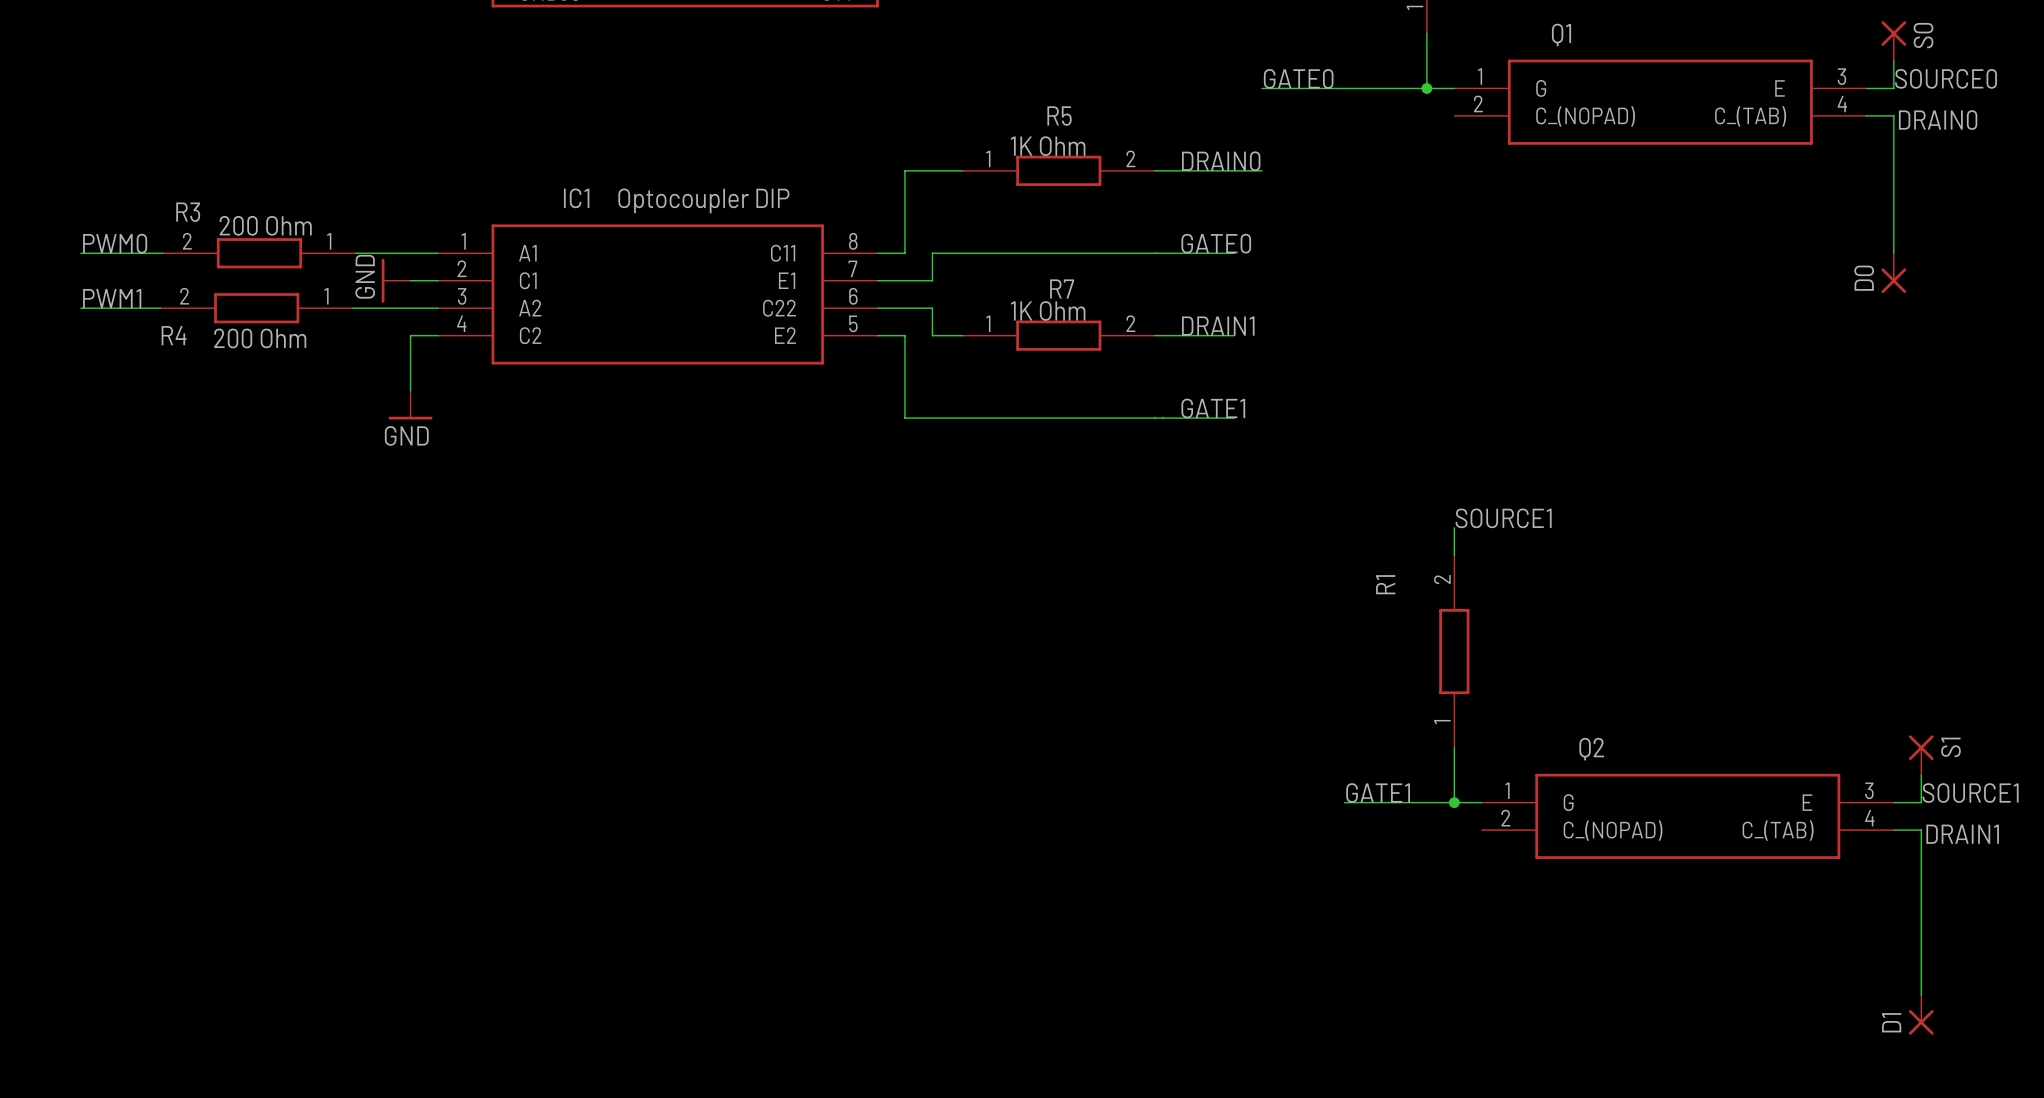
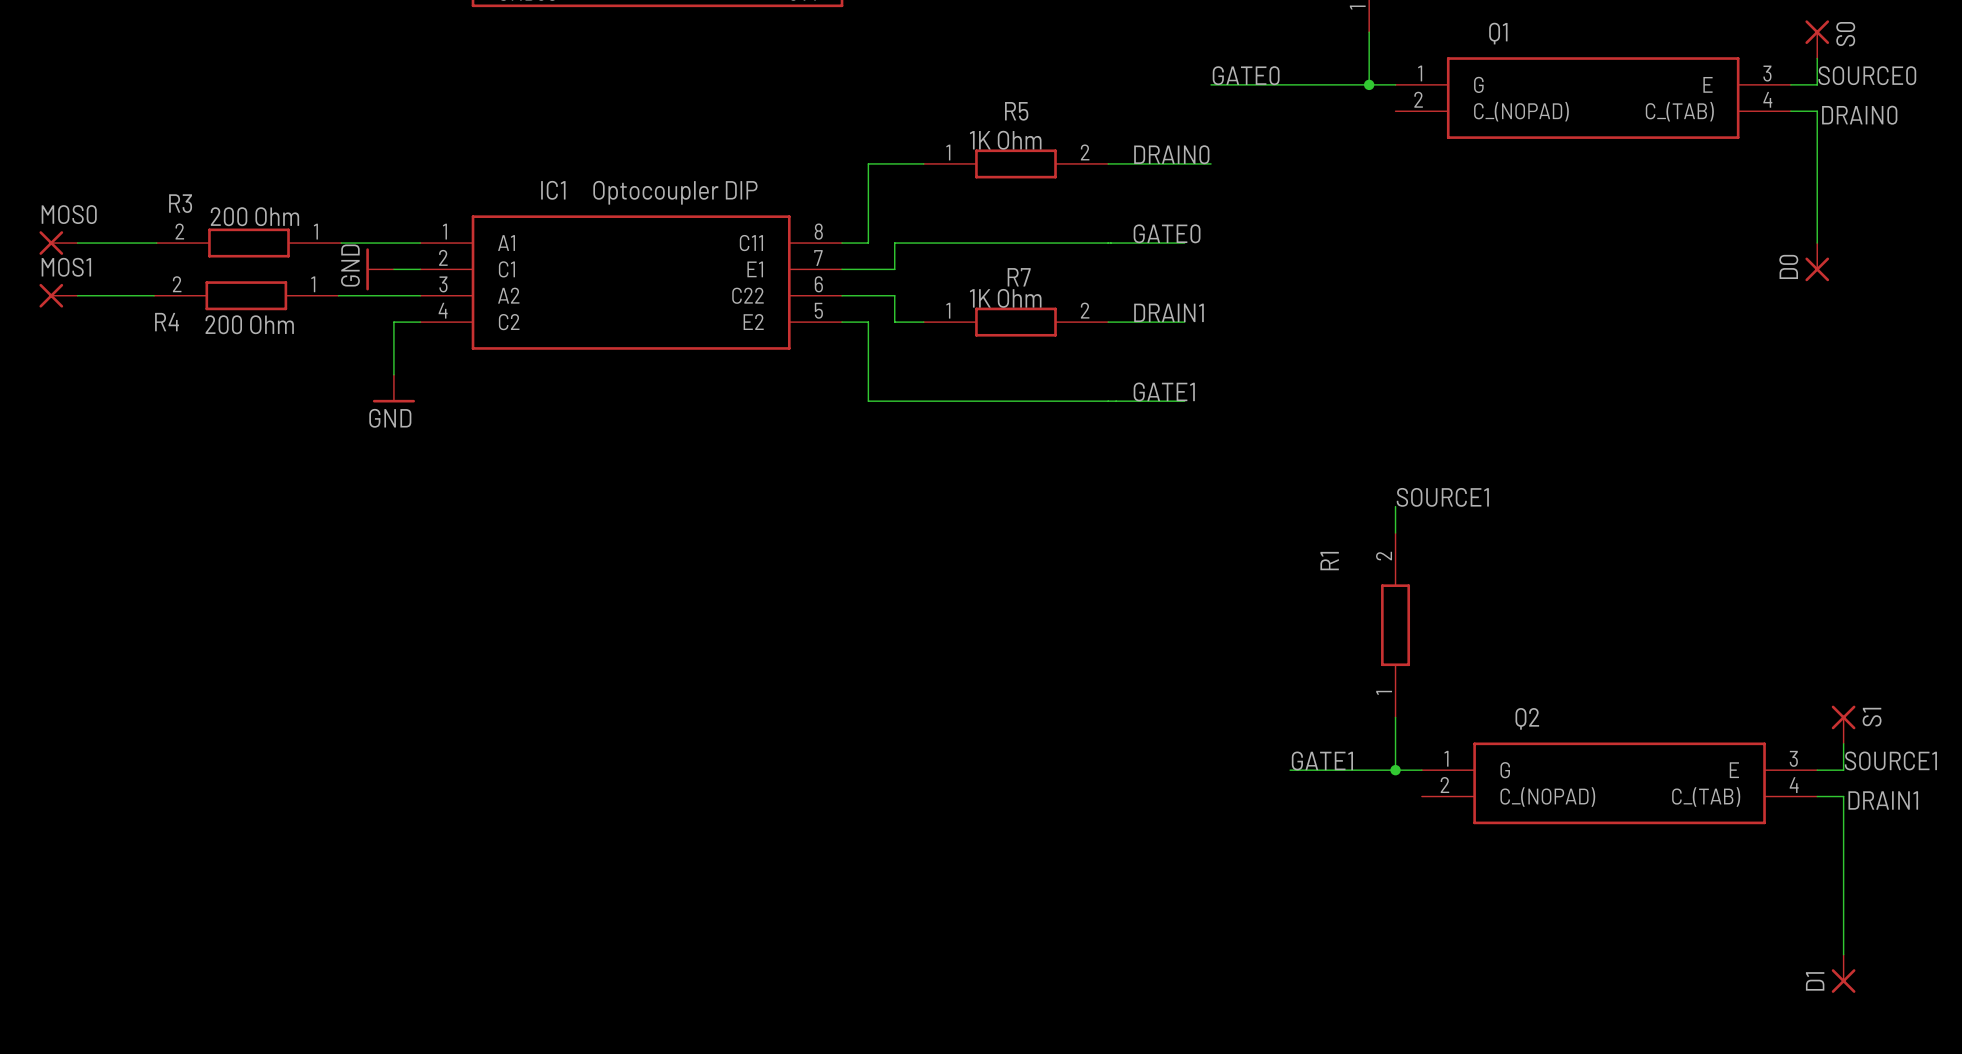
label: PWM0 (115, 243) -> none
MOS0: none -> (58, 243)
label: PWM1 (112, 298) -> none
MOS1: none -> (58, 295)

